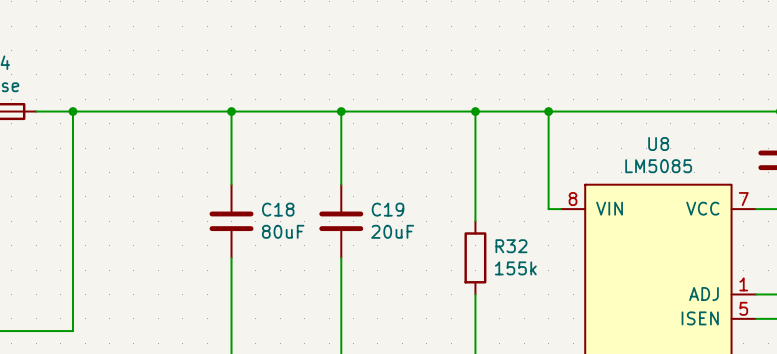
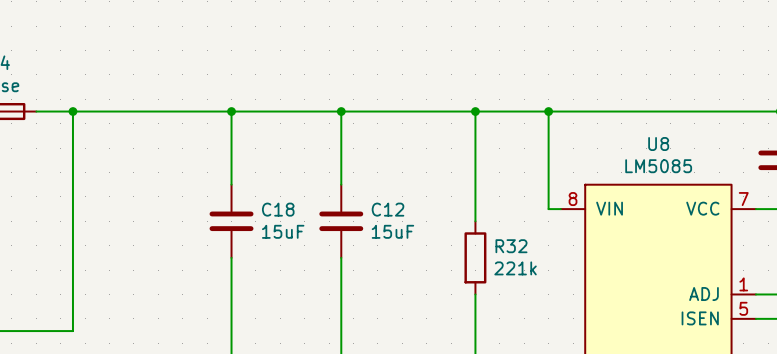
C19 name: C19 (388, 209) -> C12 (388, 209)
C18 value: 80uF (283, 231) -> 15uF (283, 231)
C19 value: 20uF (392, 231) -> 15uF (392, 231)
R32 value: 155k (515, 268) -> 221k (515, 268)

